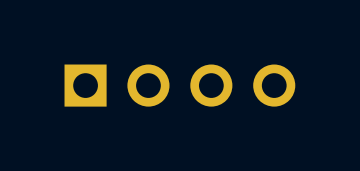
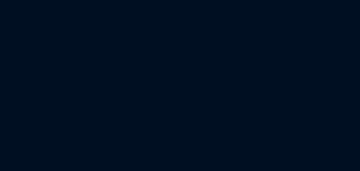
part: (179, 85) -> none

